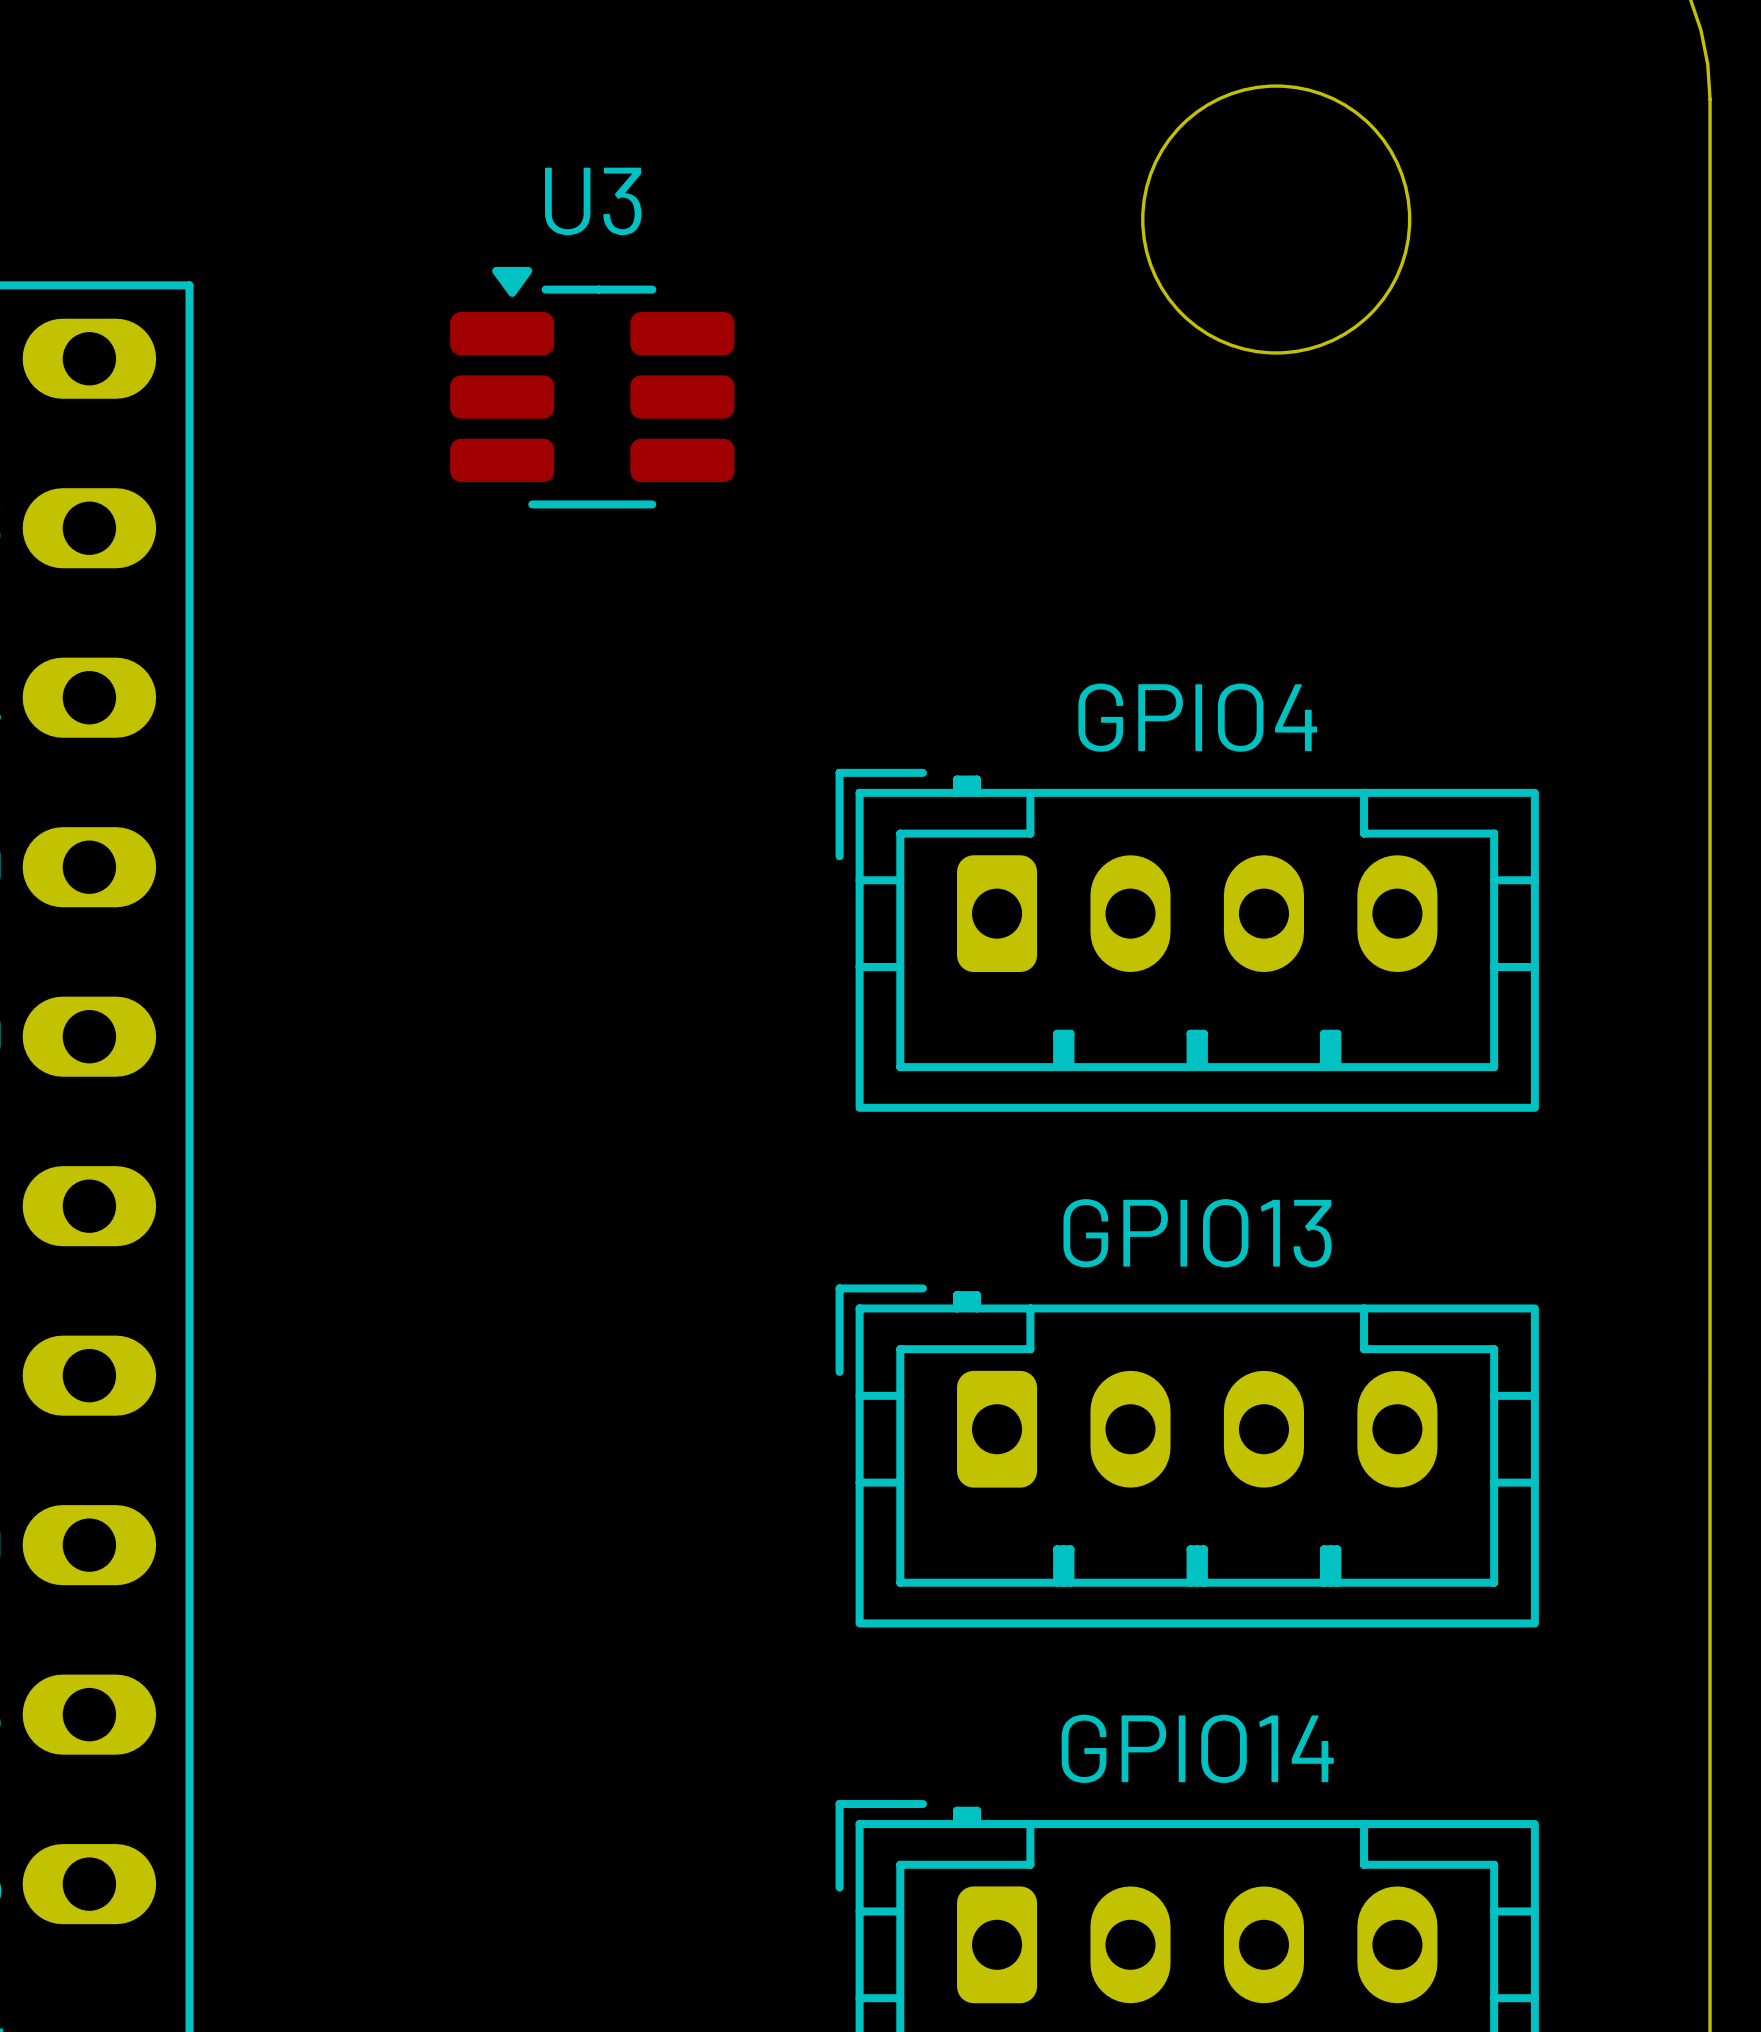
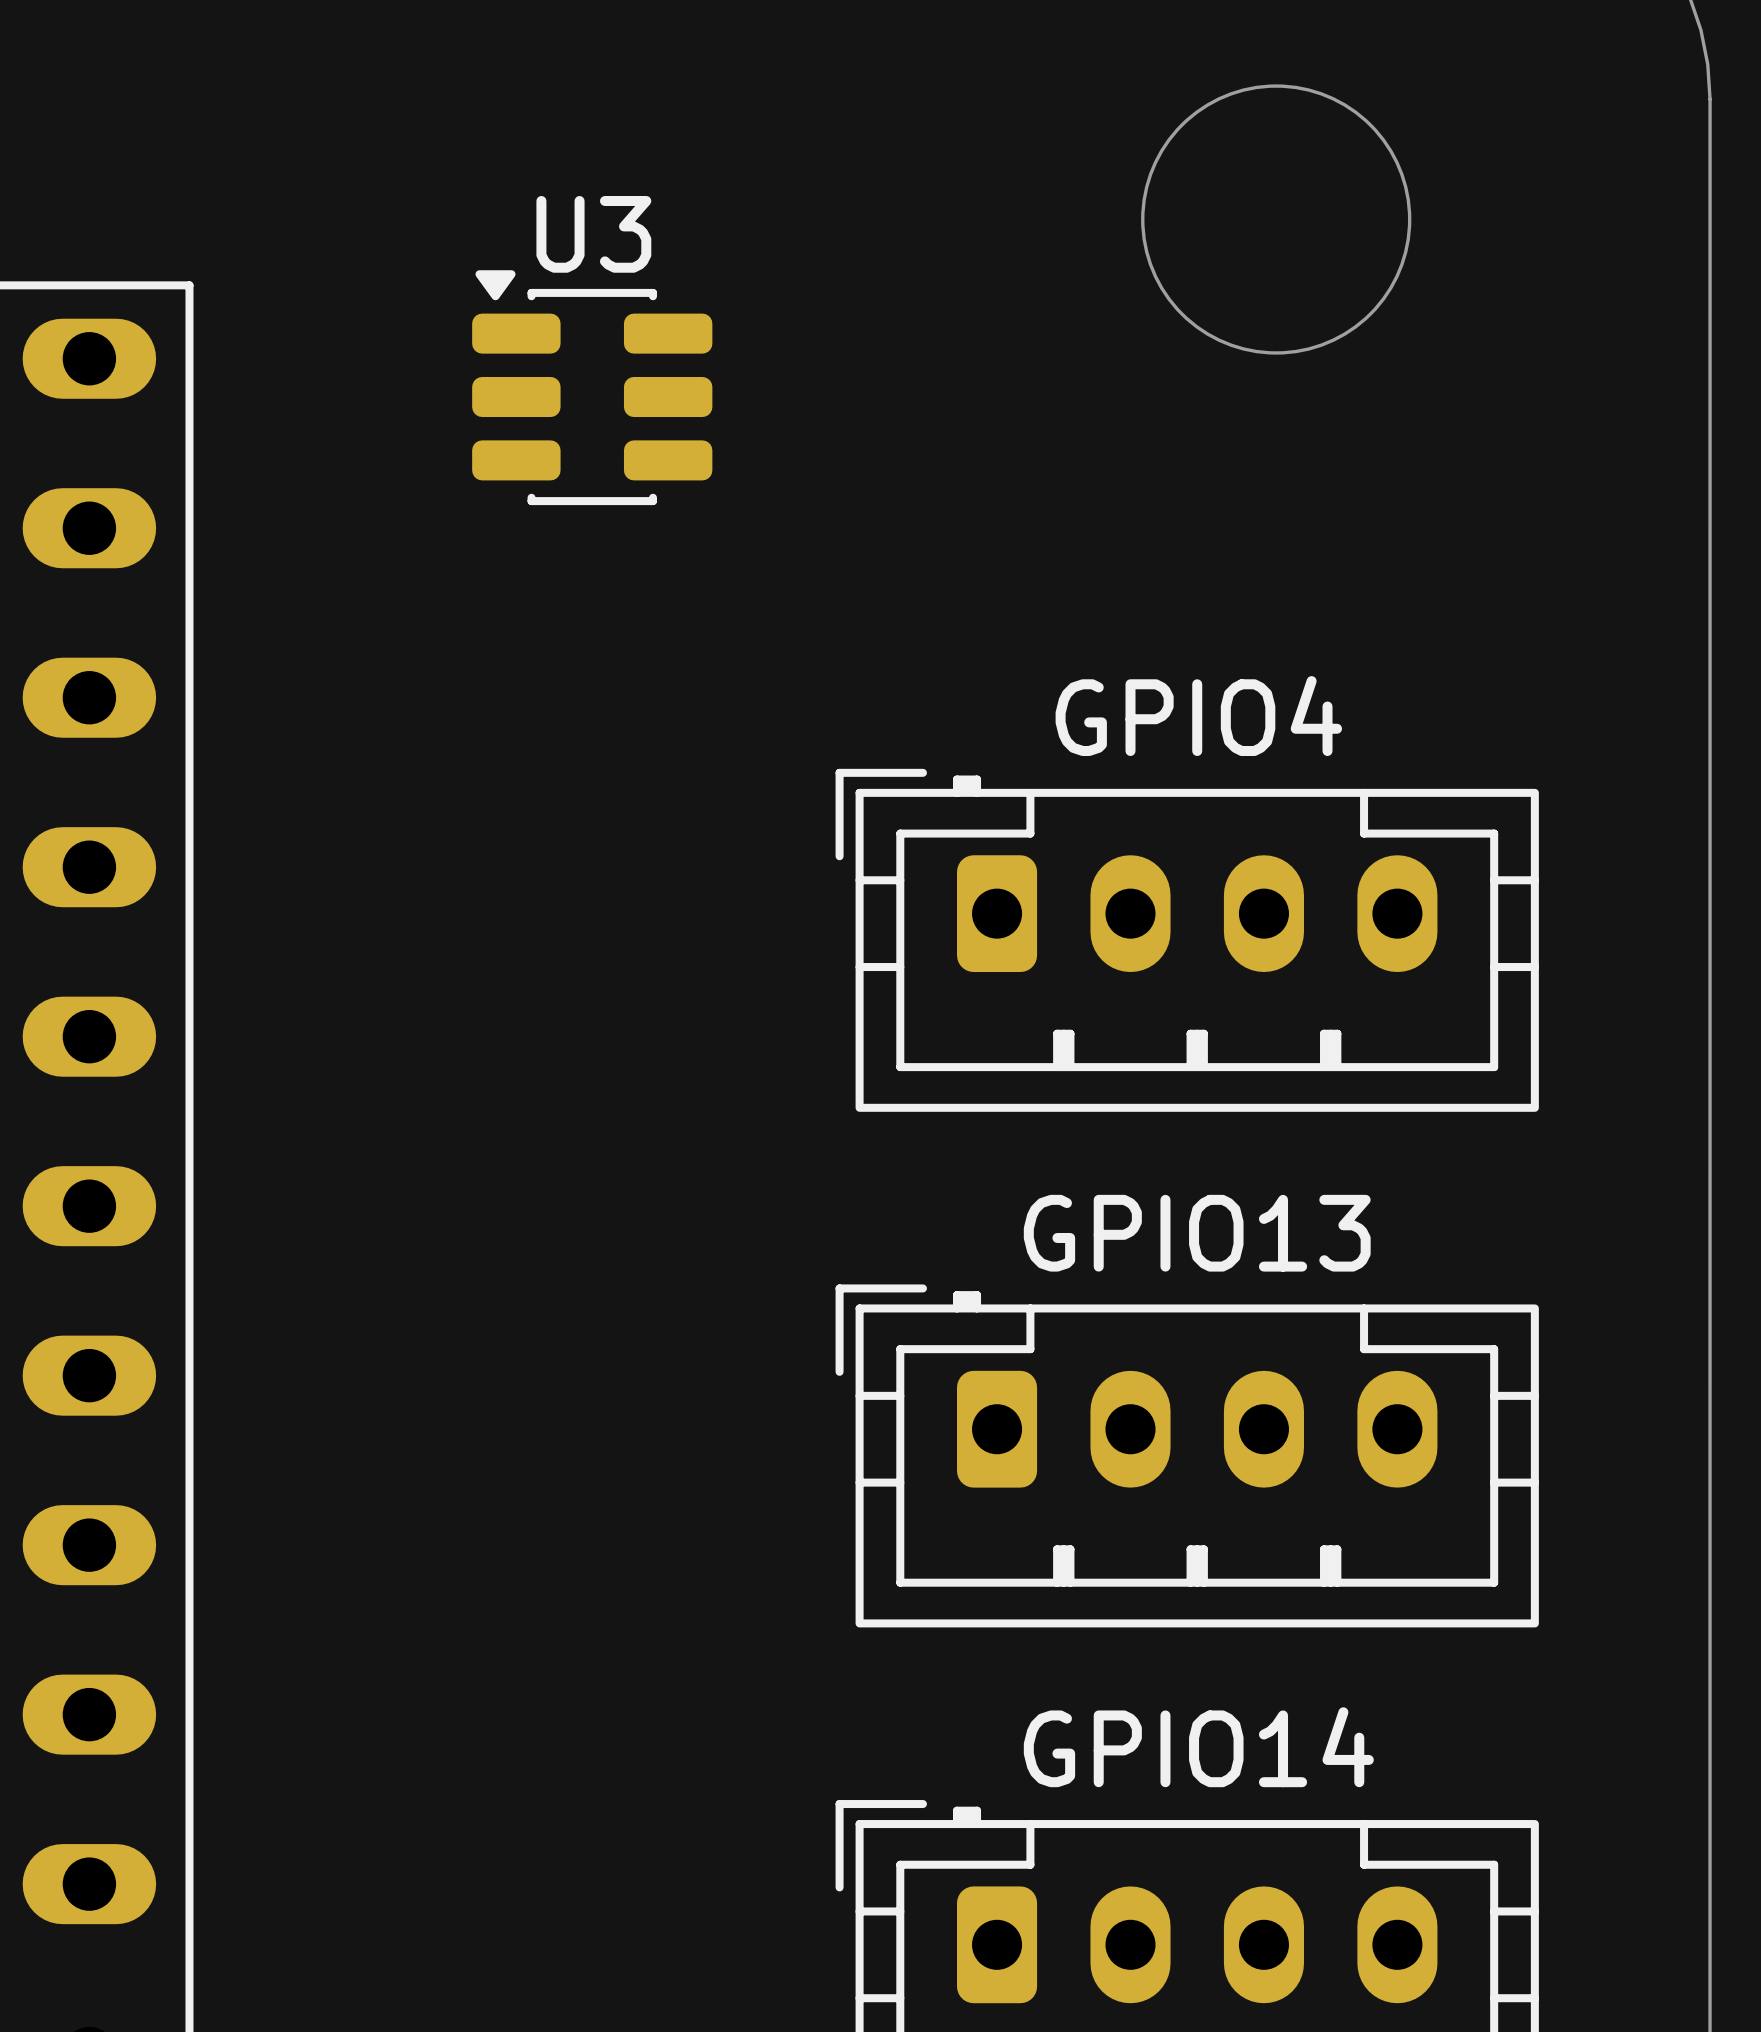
U3 name position: U3 (593, 201) -> U3 (593, 234)
U3 footprint: [450, 266, 735, 509] -> [472, 270, 713, 506]

